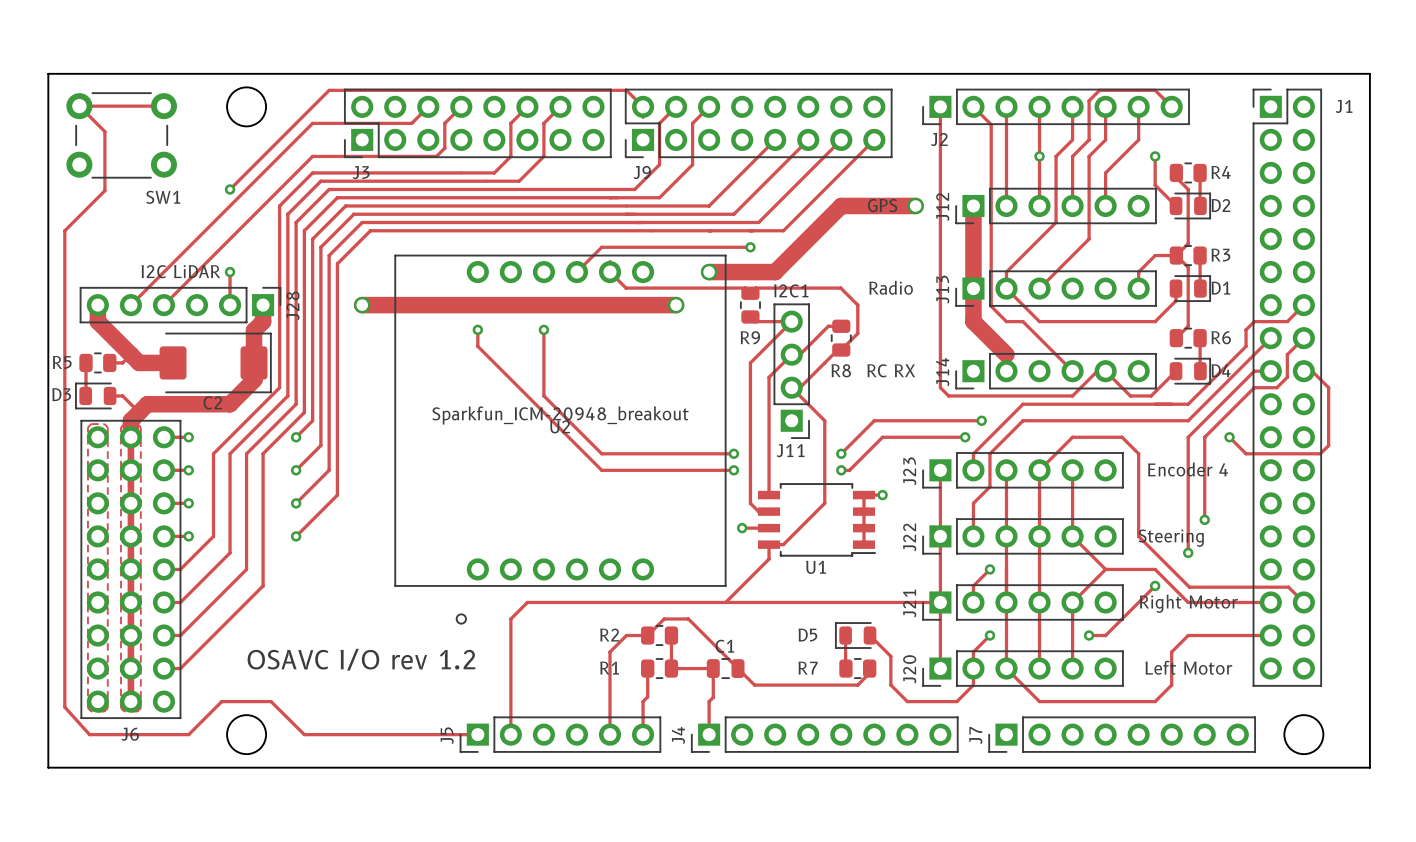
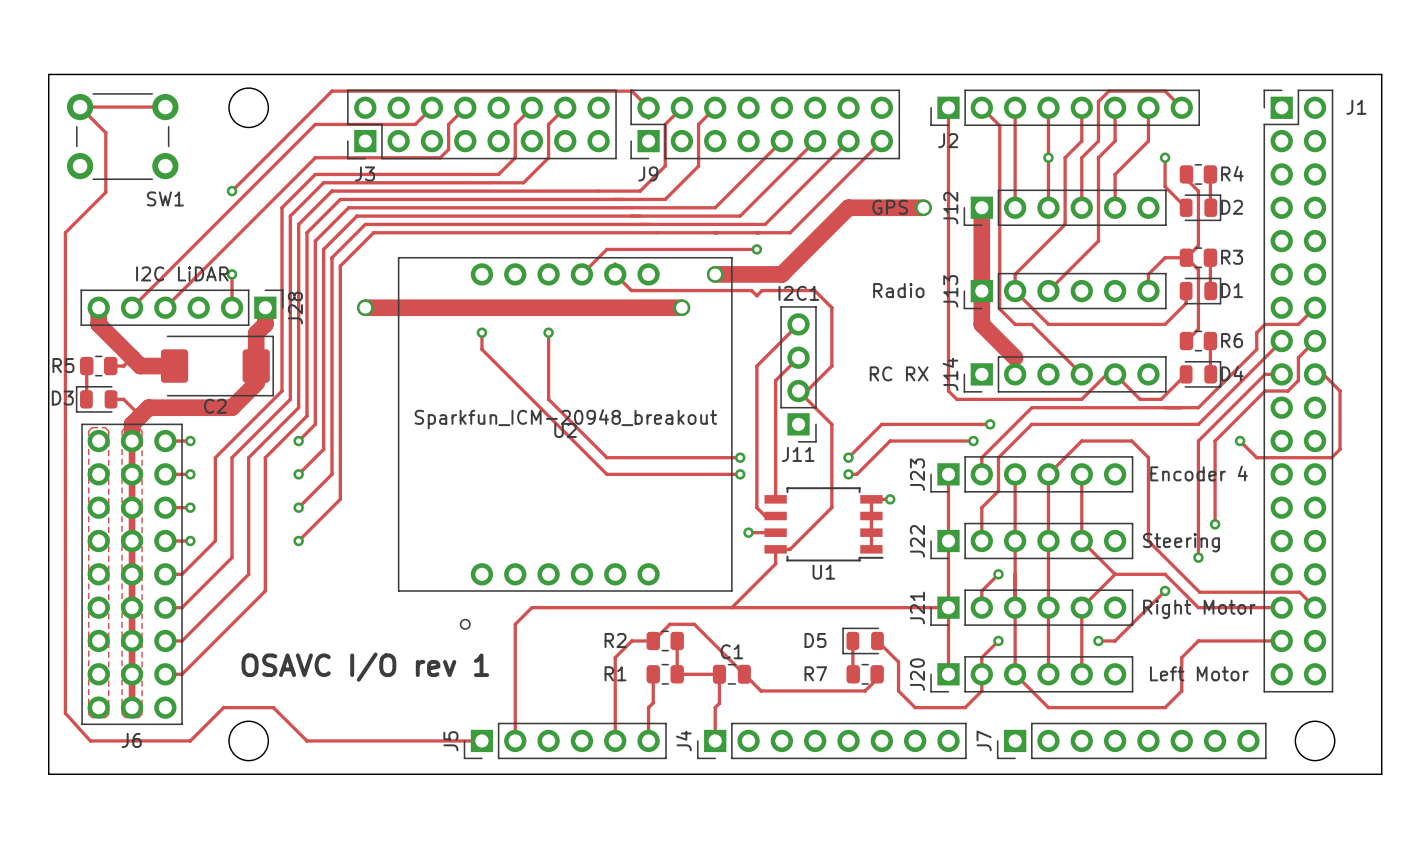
track: (807, 288) (840, 288) (857, 305) (857, 333) (841, 350) -> (814, 290) (831, 307) (831, 366)
R9: (750, 305) -> none
track: (750, 316) (755, 321) (791, 321) -> none
track: (841, 326) (828, 326) (799, 354) (791, 354) -> none
R8: (841, 338) -> none
track: (833, 354) (824, 362) -> none
text: OSAVC I/O rev 1.2 (361, 659) -> OSAVC I/O rev 1 (365, 667)

